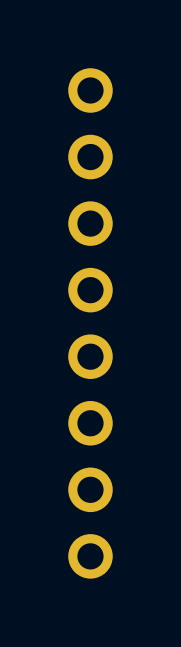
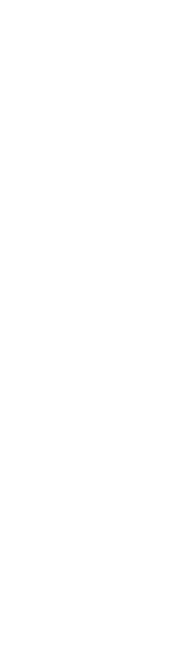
part: (90, 323) -> none

